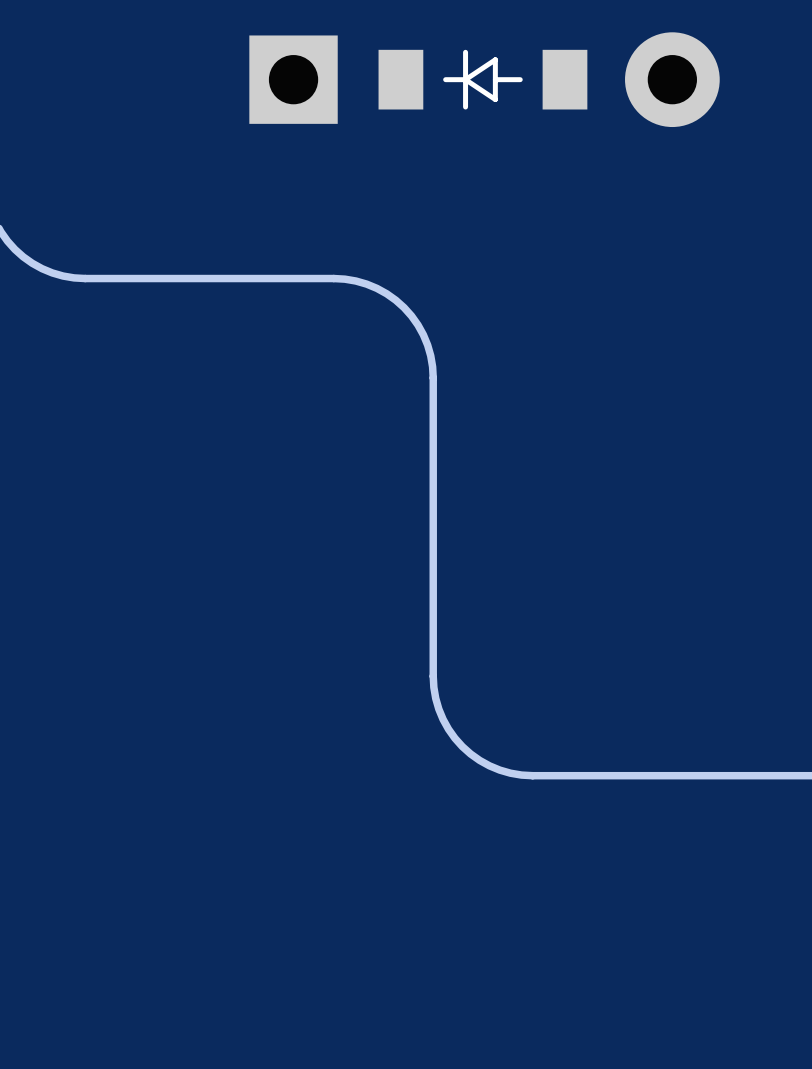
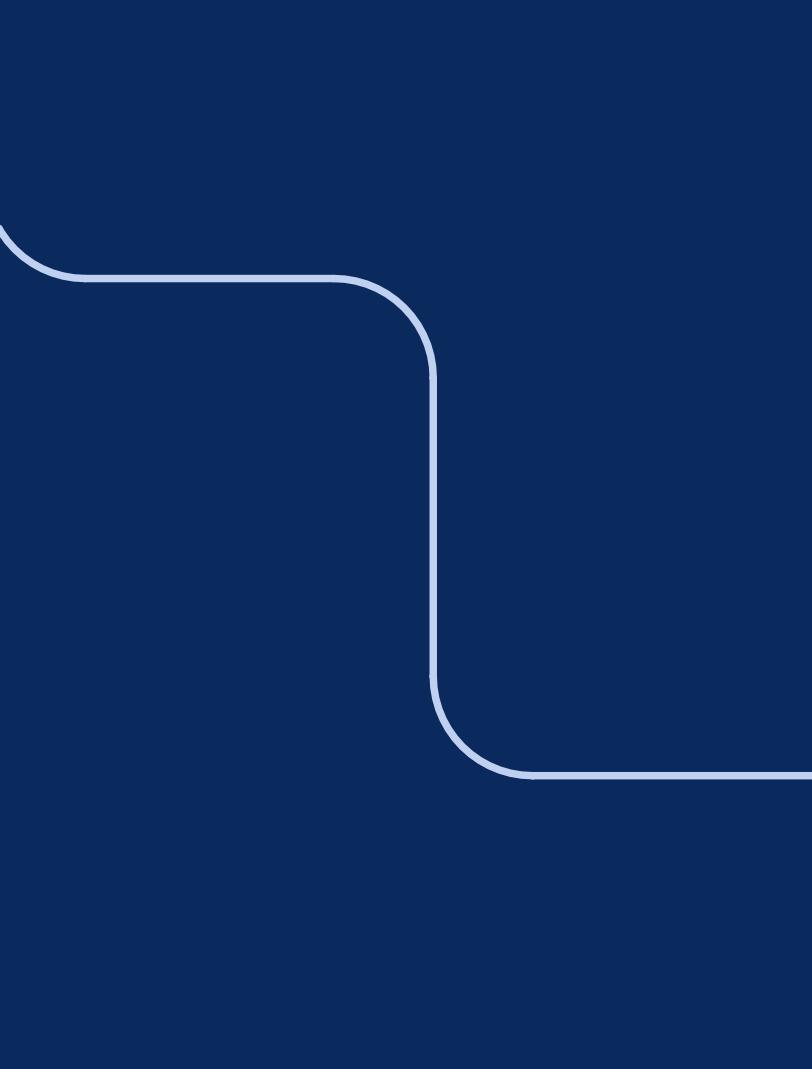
part: (484, 79) -> none

